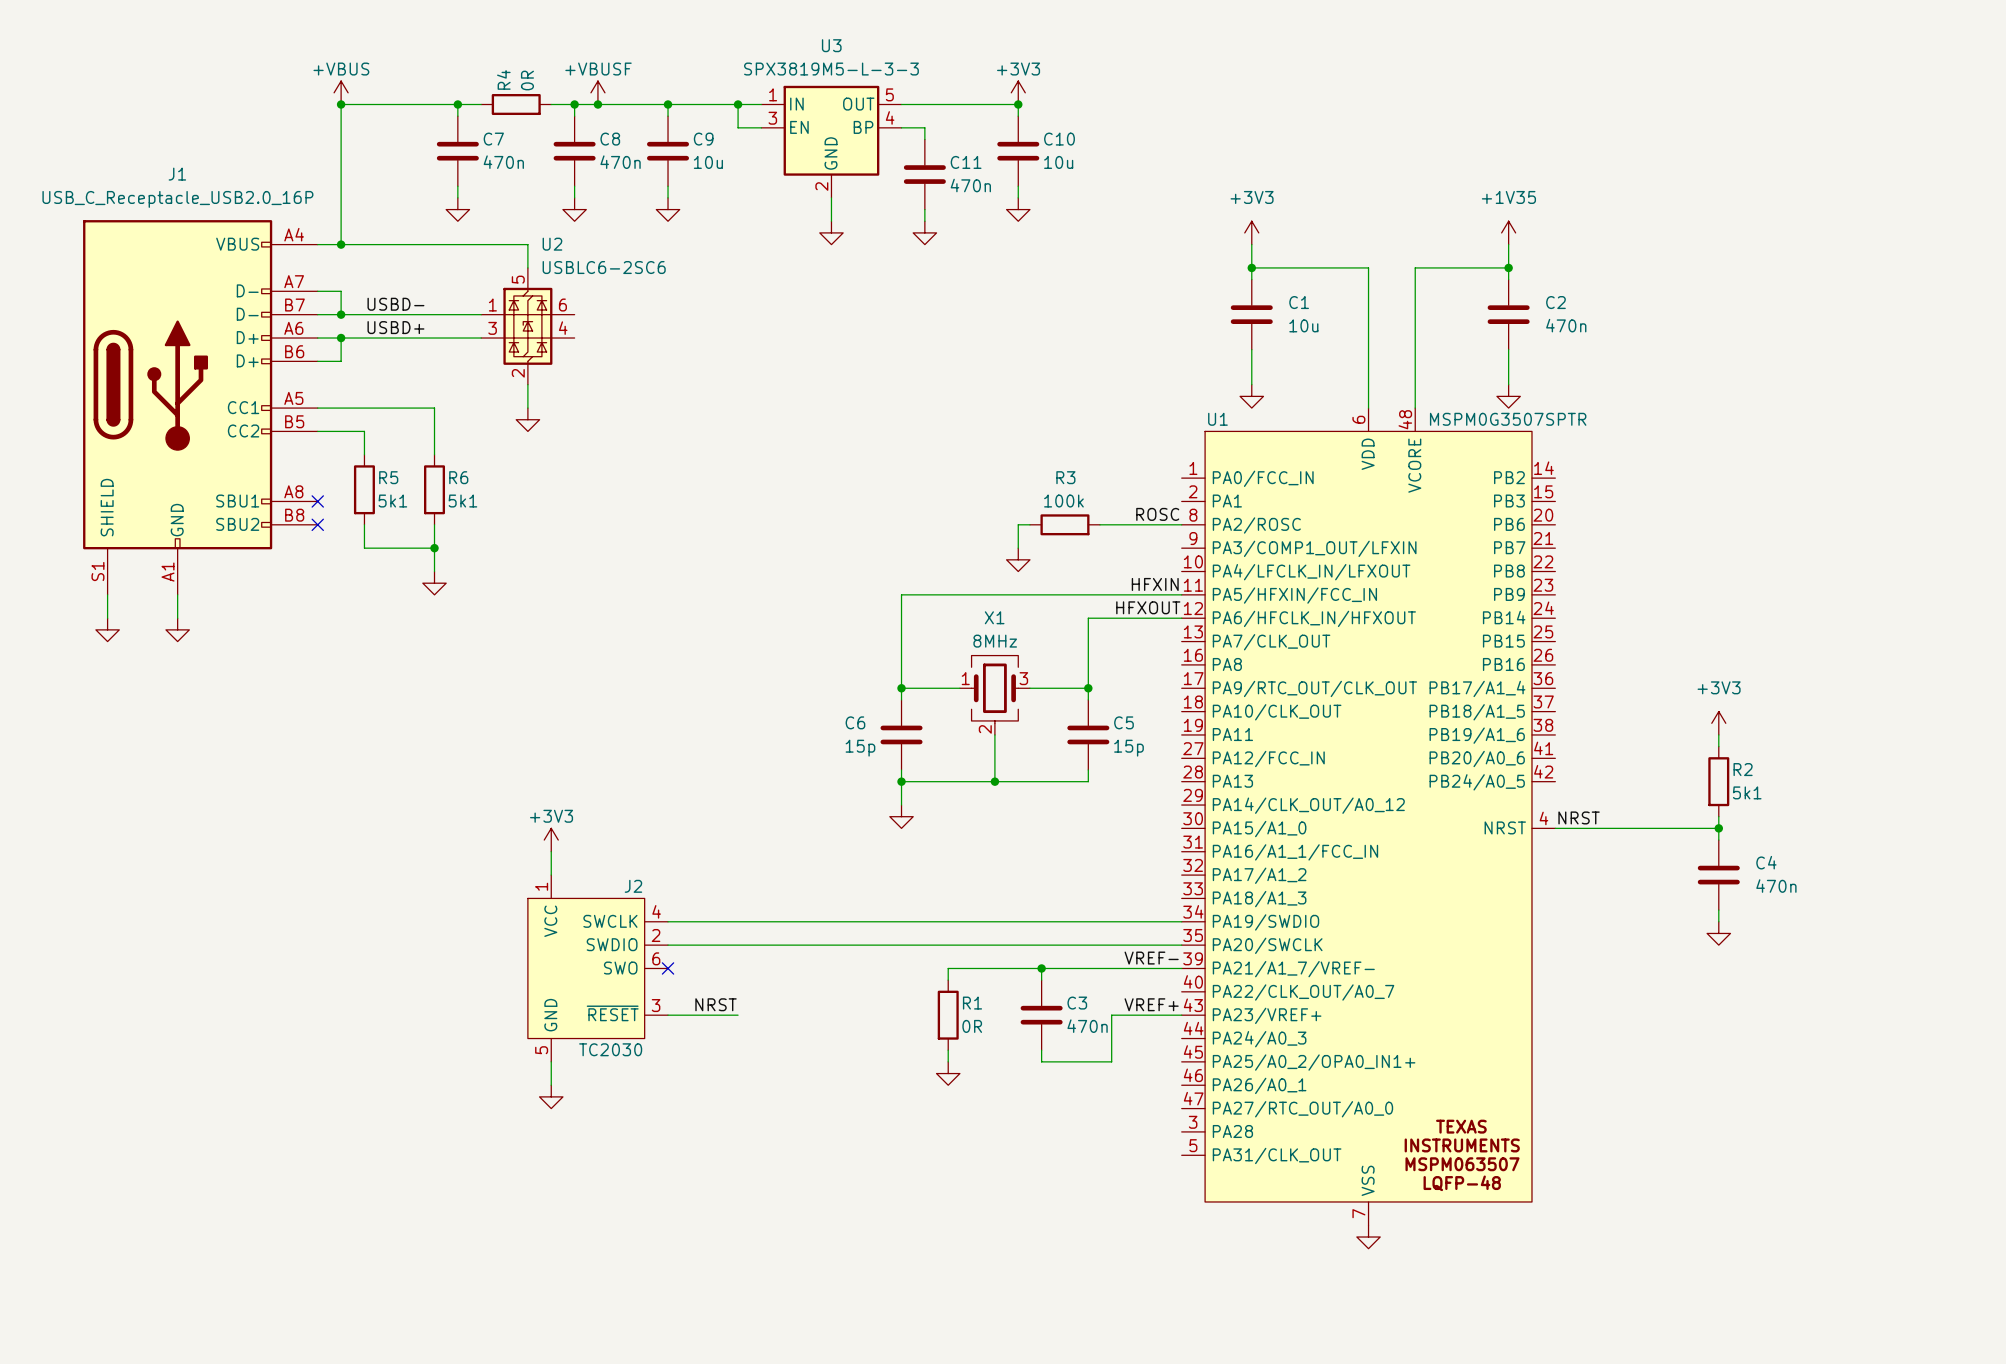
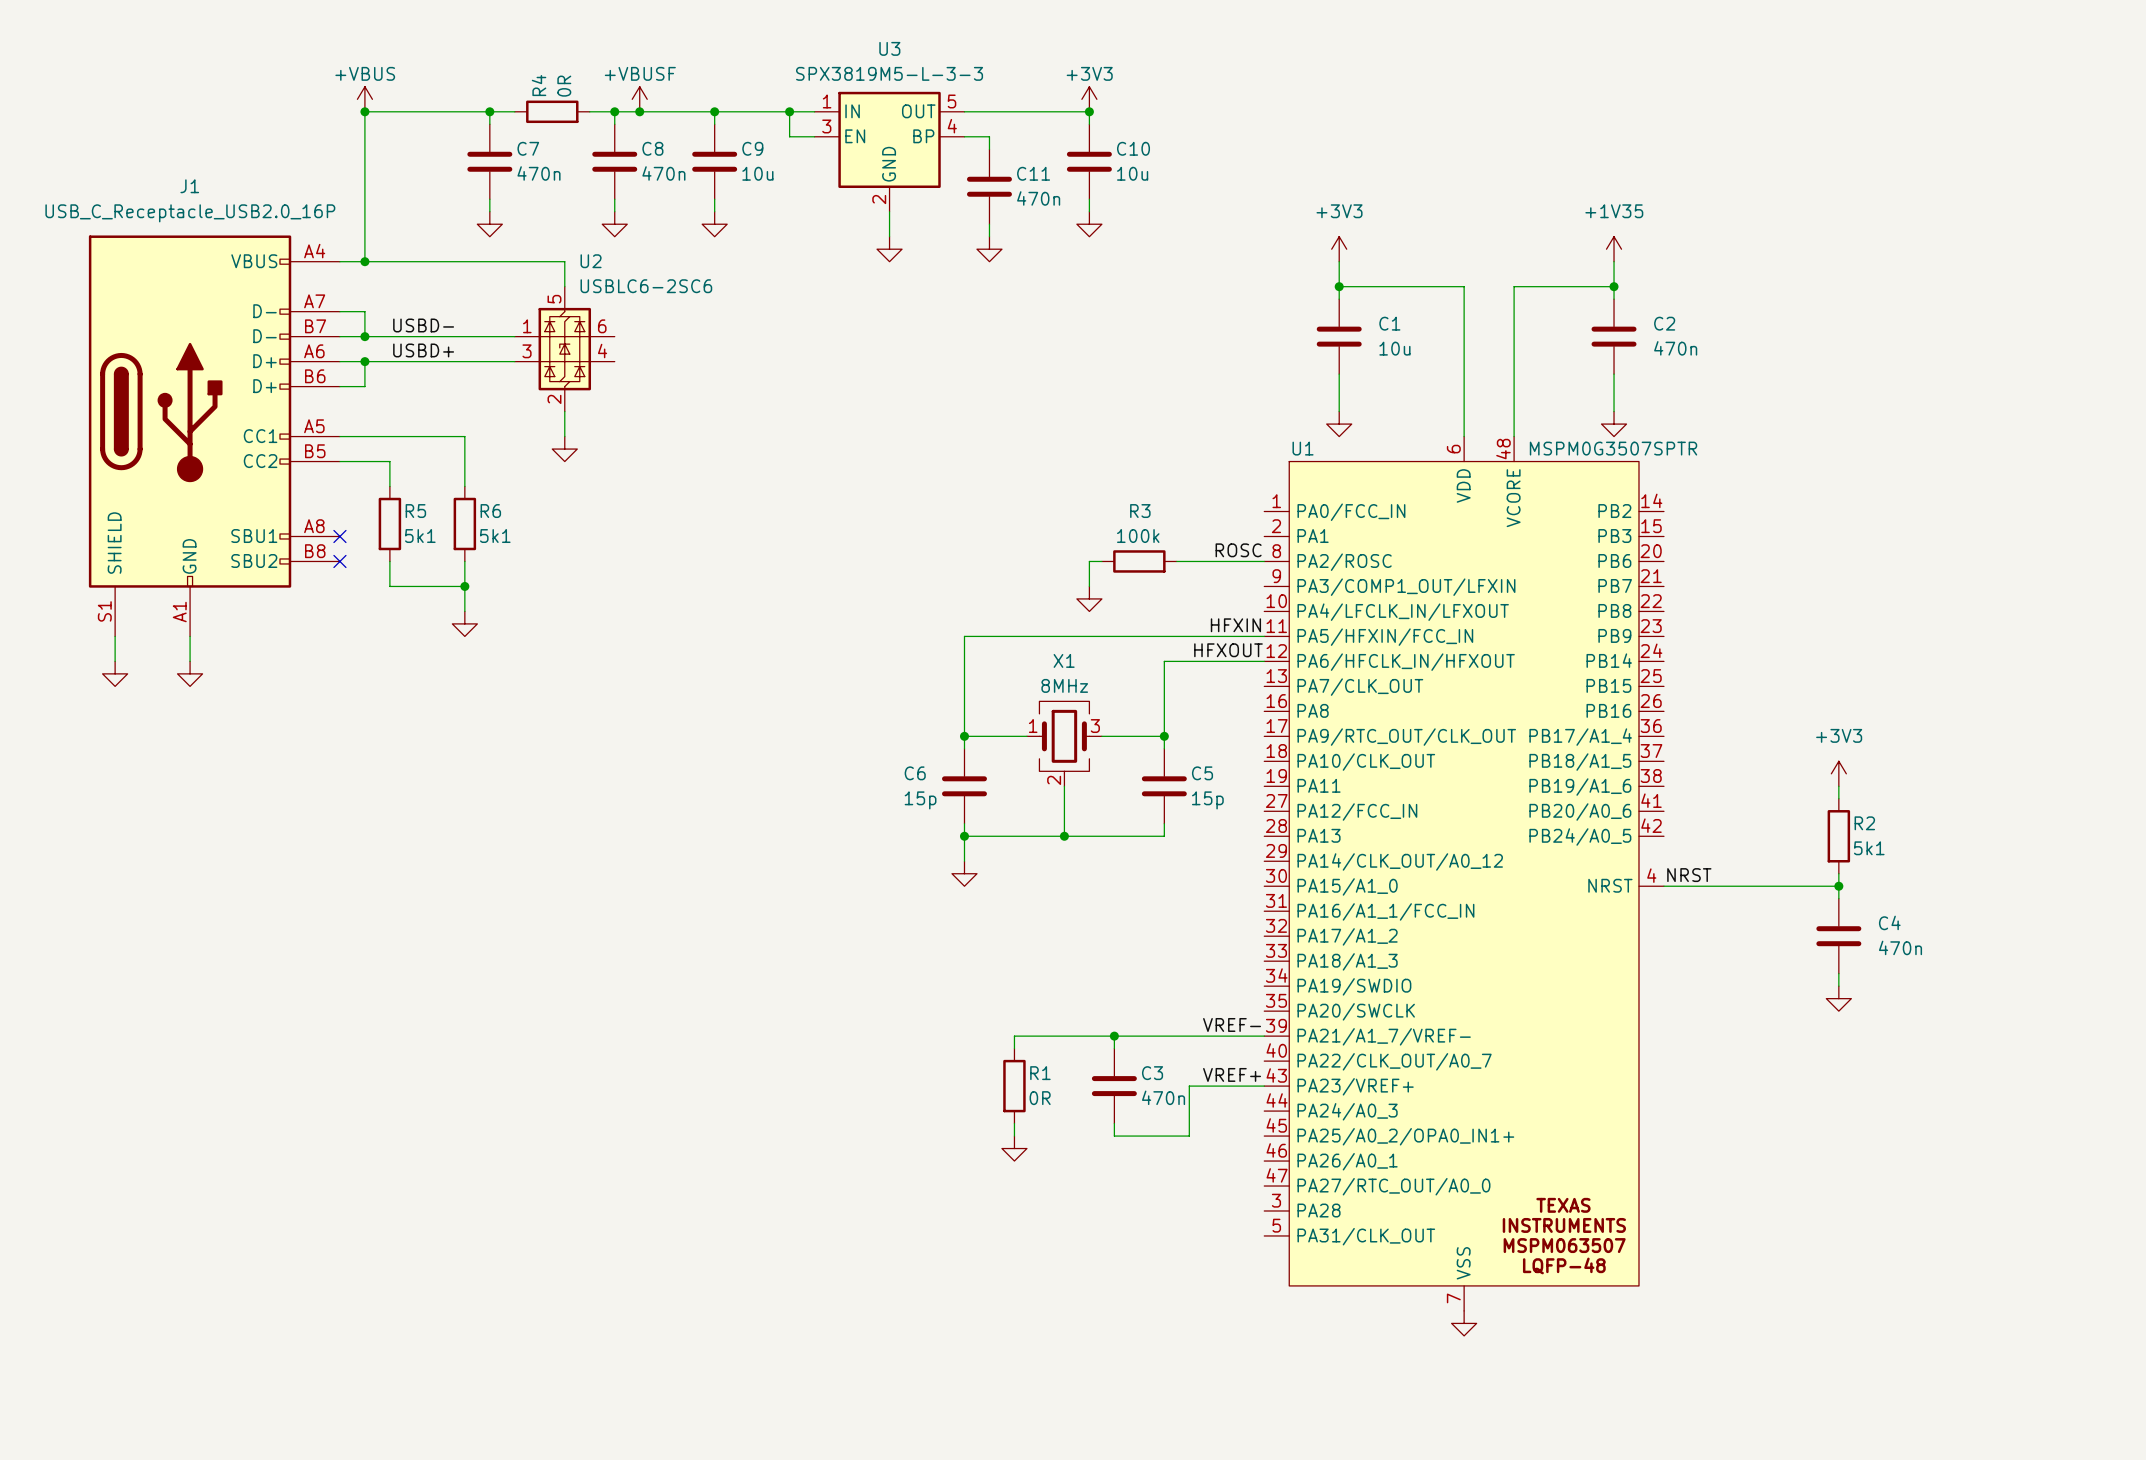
power symbol: +3V3 (551, 840) -> none
wire: (551, 851) (551, 875) -> none
wire: (668, 921) (1181, 921) -> none
wire: (668, 945) (1181, 945) -> none
J2: TC2030 (597, 968) -> none
no-connect mark: (668, 968) -> none
label: NRST (716, 1004) -> none
wire: (668, 1015) (738, 1015) -> none
wire: (551, 1061) (551, 1085) -> none
power symbol: (551, 1096) -> none

